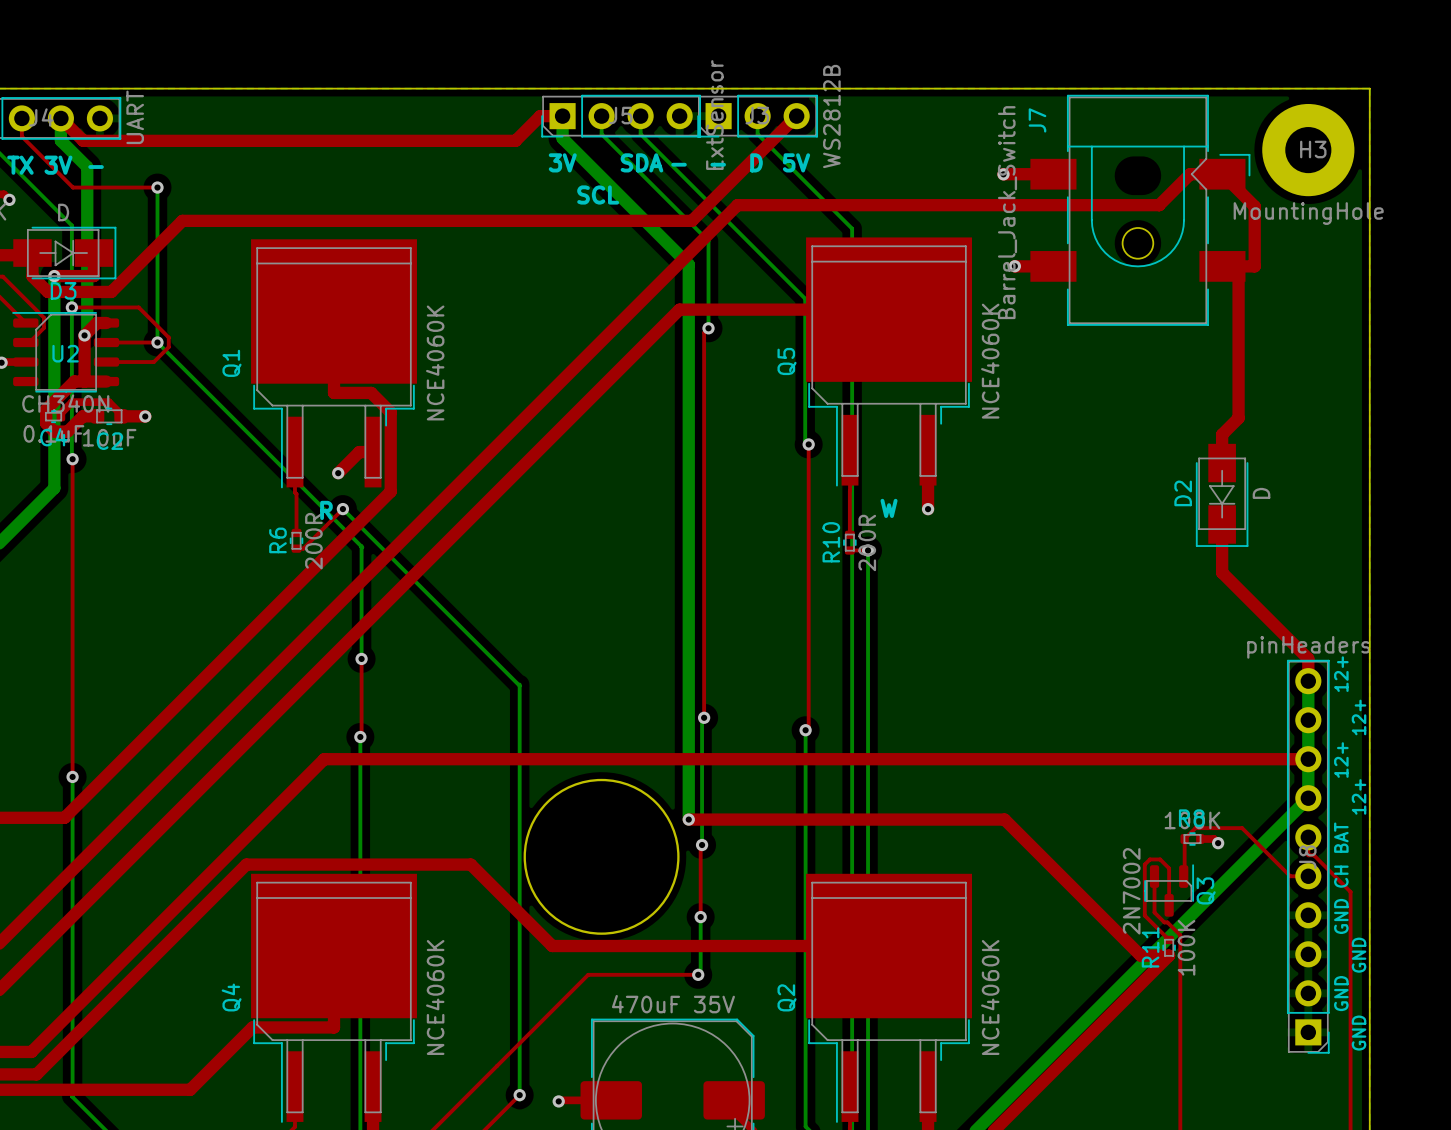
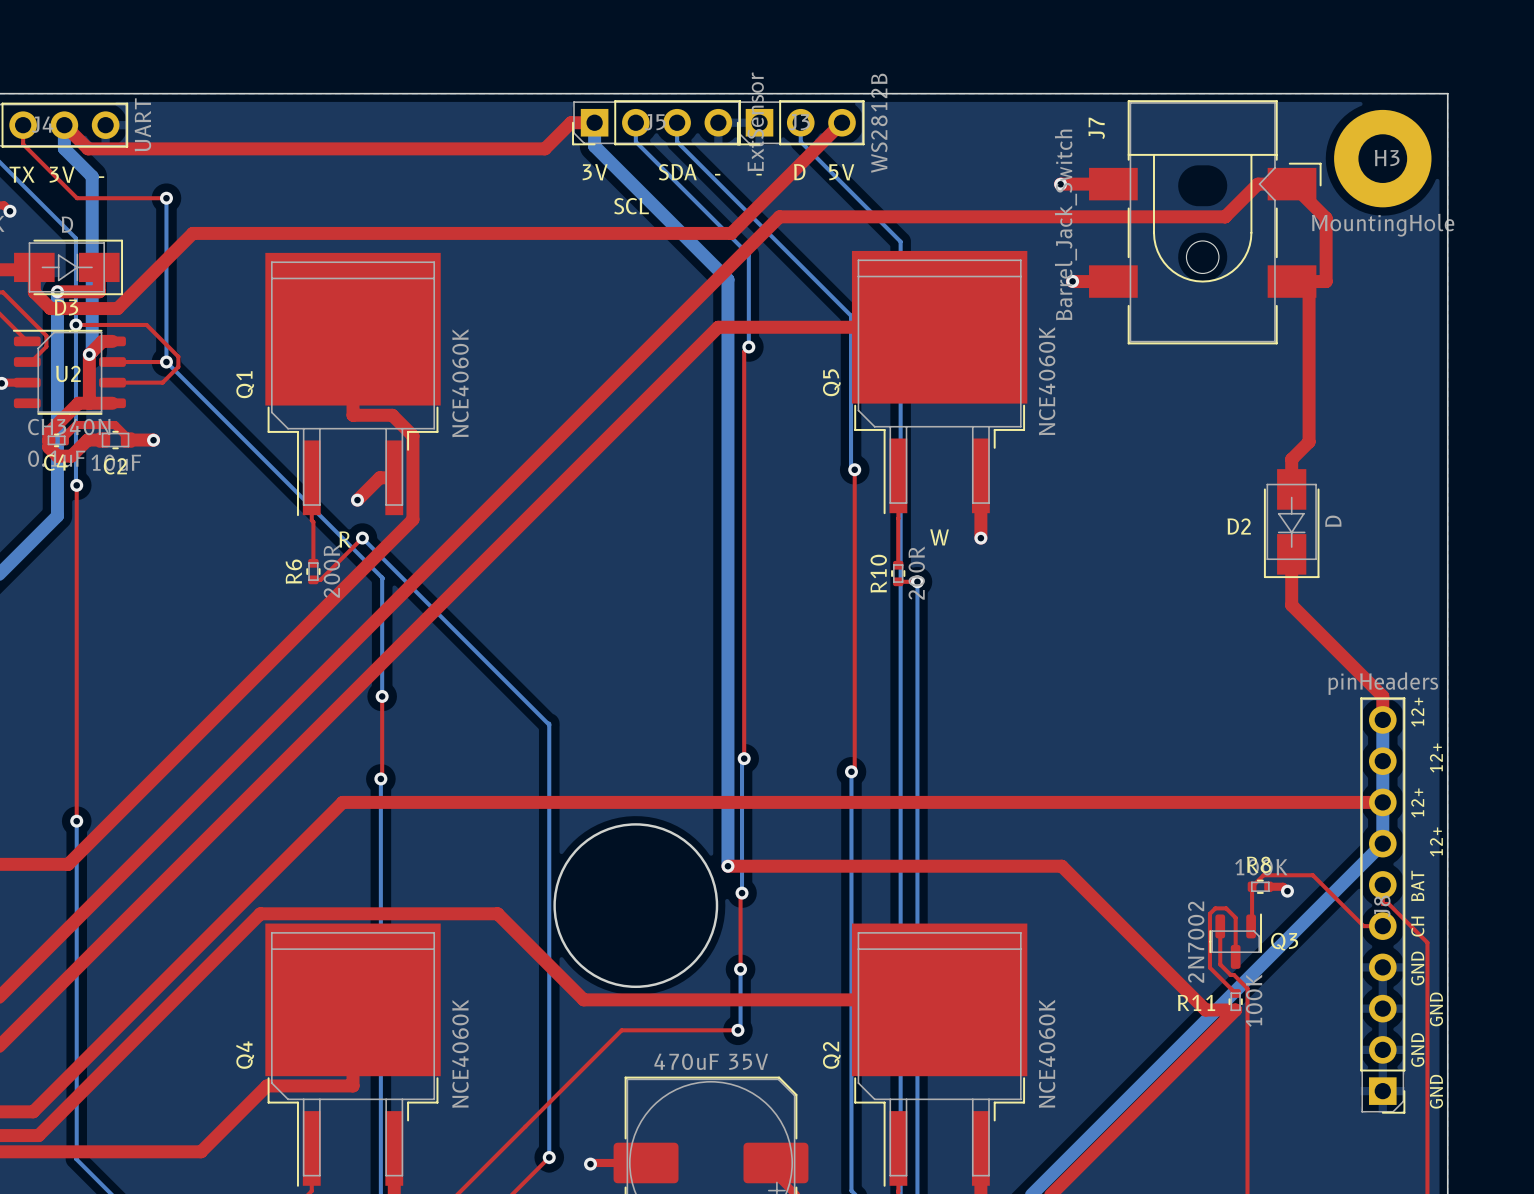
D2 name rotation: 0° (1183, 493) -> 90° clockwise (1239, 526)
Q3 name rotation: 0° (1206, 890) -> 90° clockwise (1284, 941)
R11 name rotation: 0° (1150, 947) -> 90° clockwise (1196, 1002)

